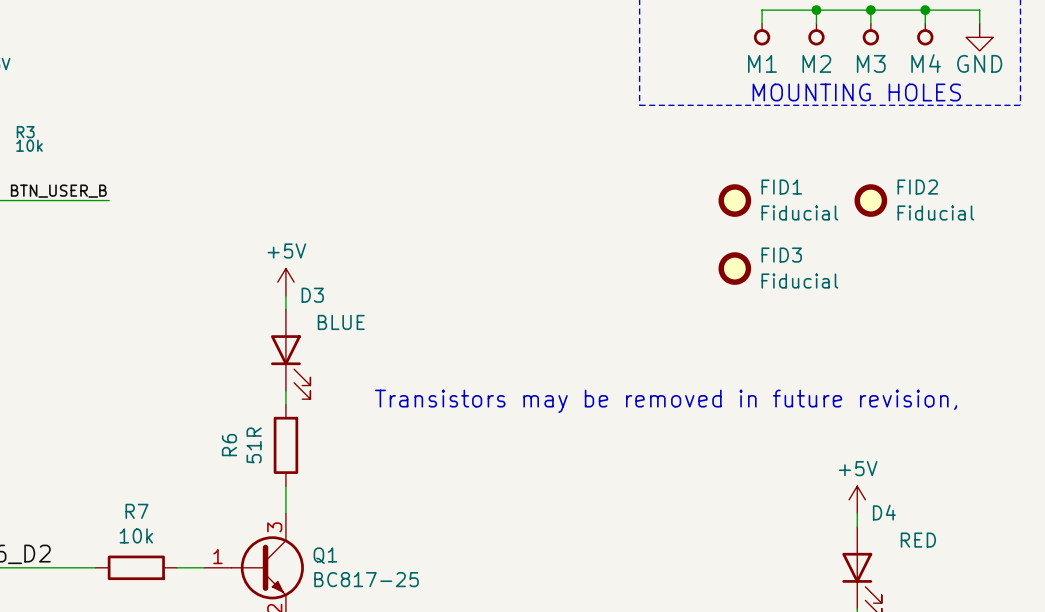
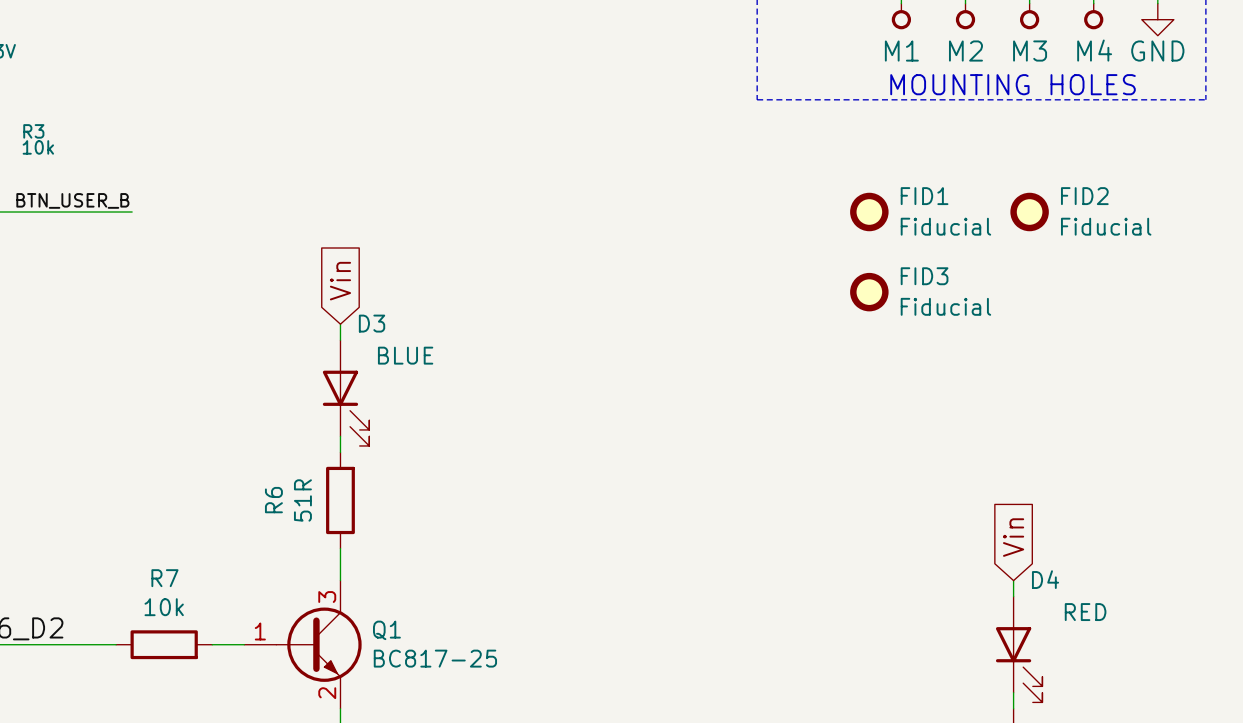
global label: none -> Vin (340, 281)
power symbol: +5V (285, 282) -> none
text: Transistors may be removed in future revision, (666, 401) -> none
global label: none -> Vin (1013, 537)
power symbol: +5V (857, 499) -> none

